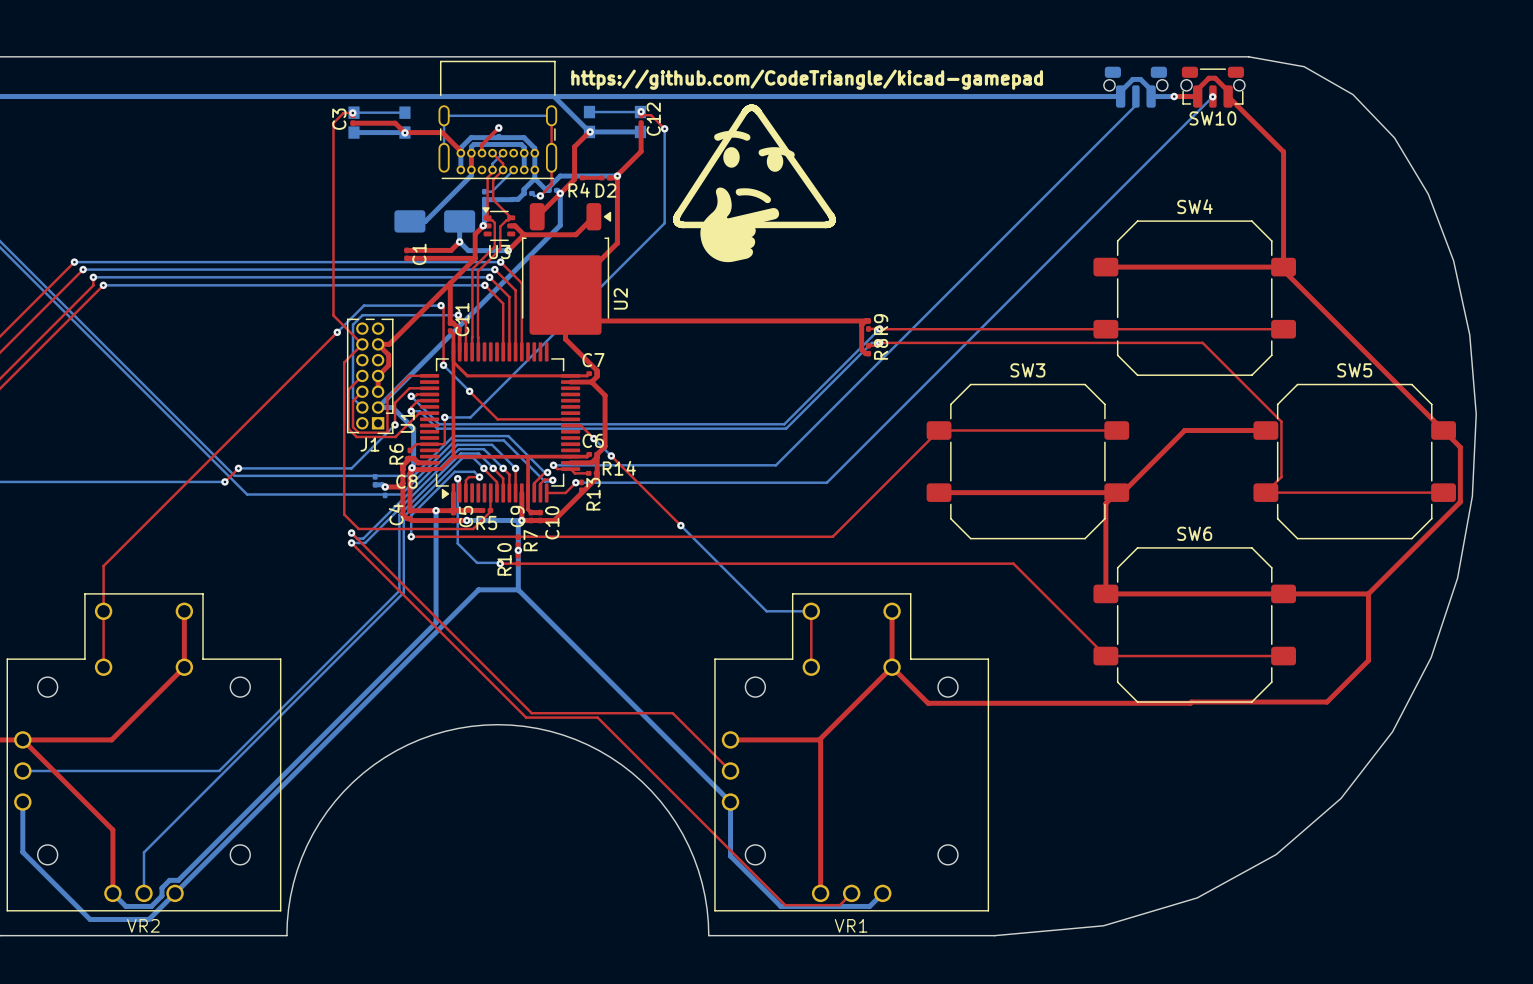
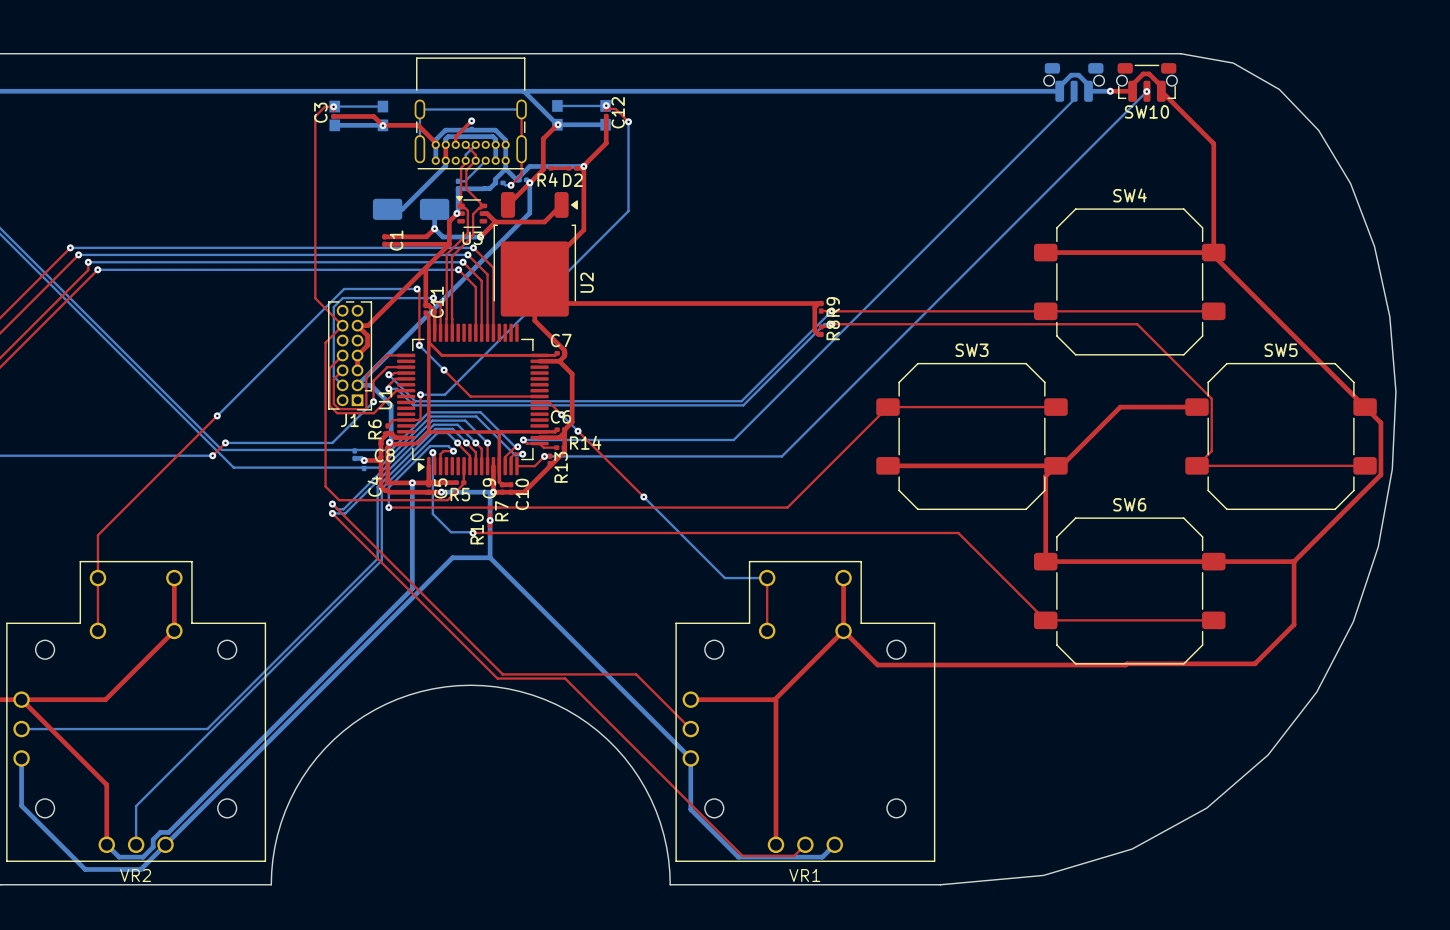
text: https://github.com/CodeTriangle/kicad-gamepad (807, 79) -> none
line: (751, 107) (745, 111) (678, 214) (677, 222) (683, 224) (830, 223) (832, 220) (830, 214) (758, 111) (751, 107) -> none
drawing: [714, 130, 795, 172] -> none
drawing: [700, 187, 780, 263] -> none
top track: (337, 332) (229, 439) -> none
bottom track: none -> (318, 314) (217, 415)
via: (337, 332) -> none
via: none -> (217, 415)

